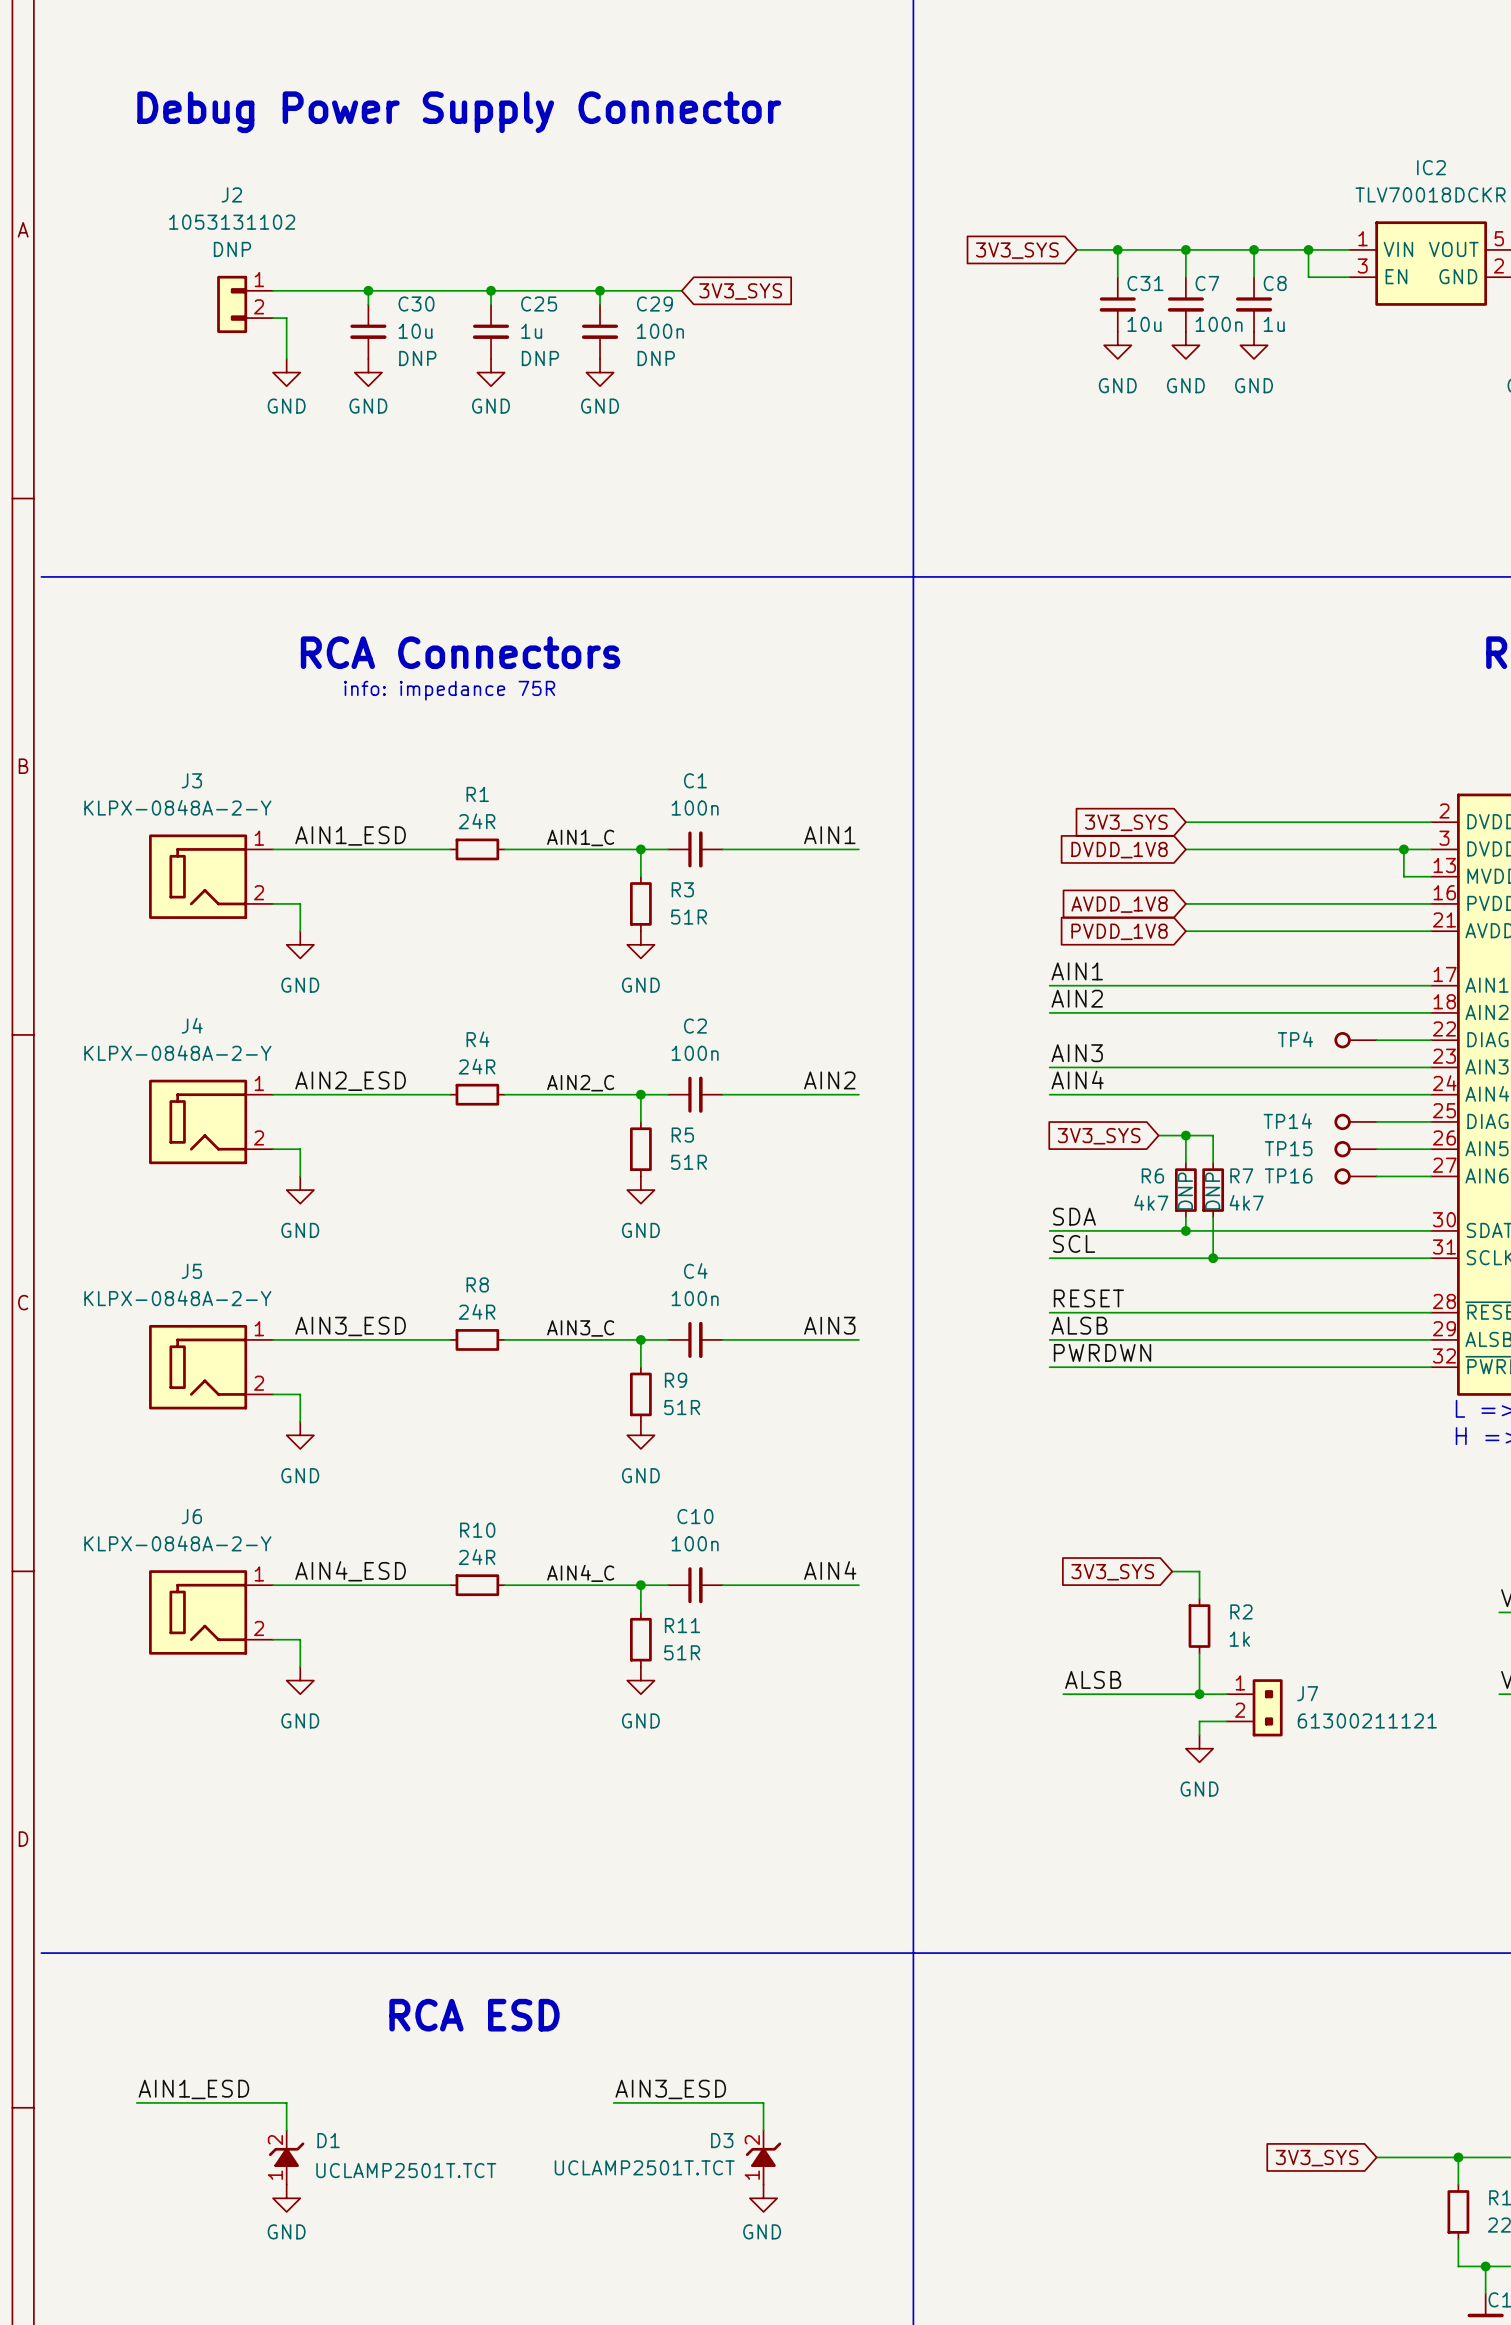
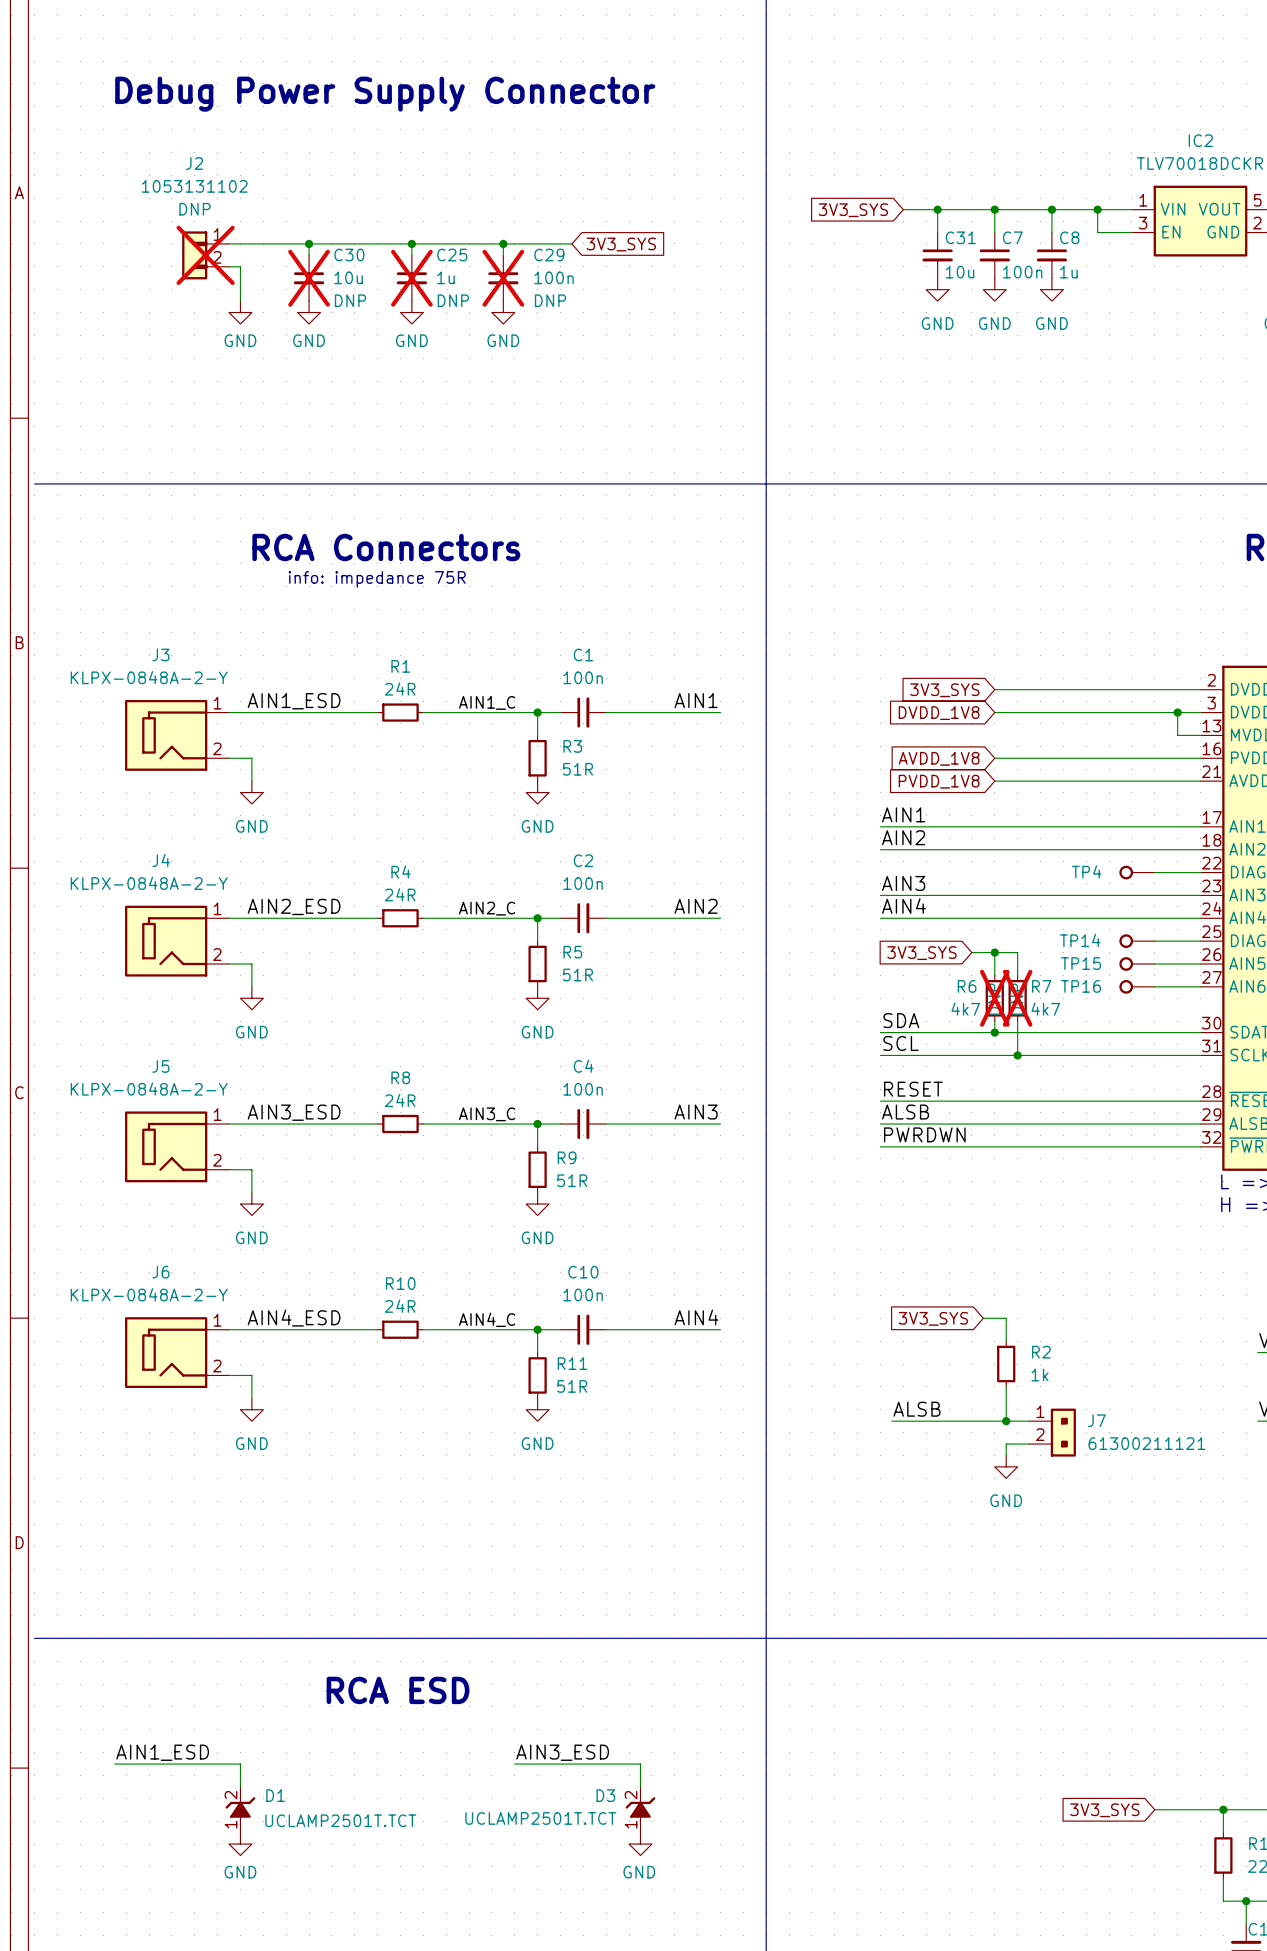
J2 do-not-place cross: none -> (205, 255)
C30 do-not-place cross: none -> (309, 278)
C25 do-not-place cross: none -> (411, 278)
C29 do-not-place cross: none -> (503, 278)
R6 do-not-place cross: none -> (994, 998)
R7 do-not-place cross: none -> (1017, 998)

